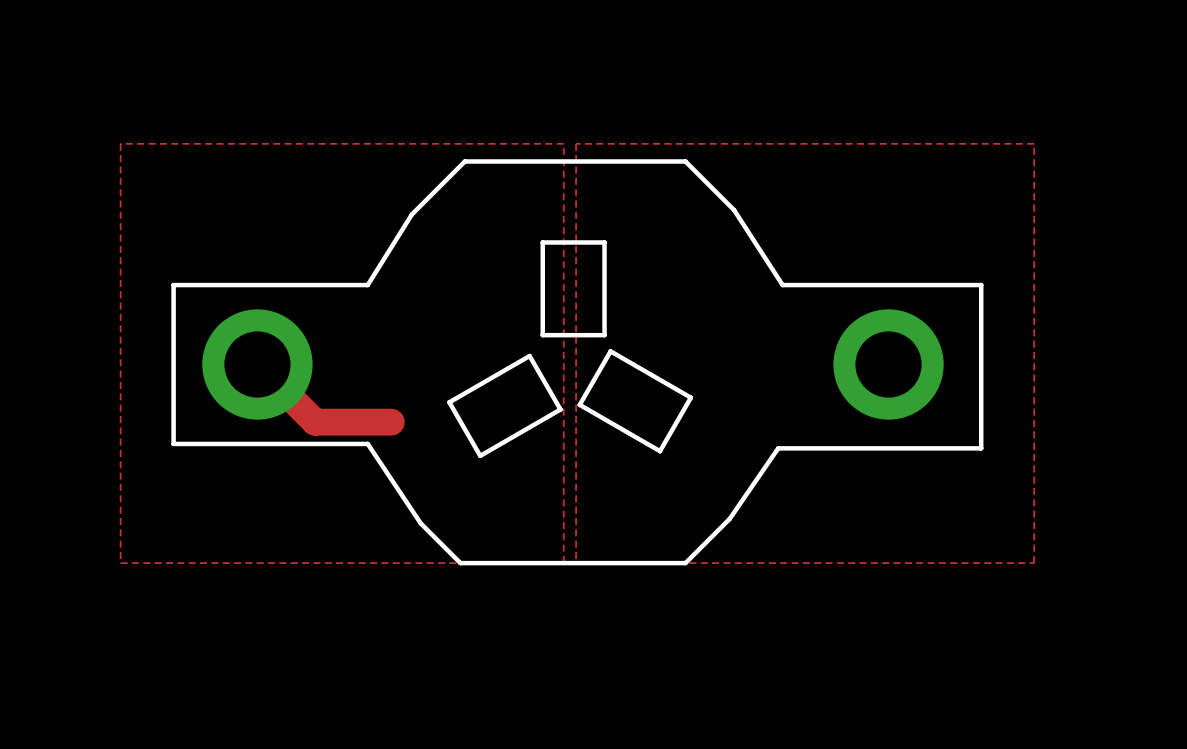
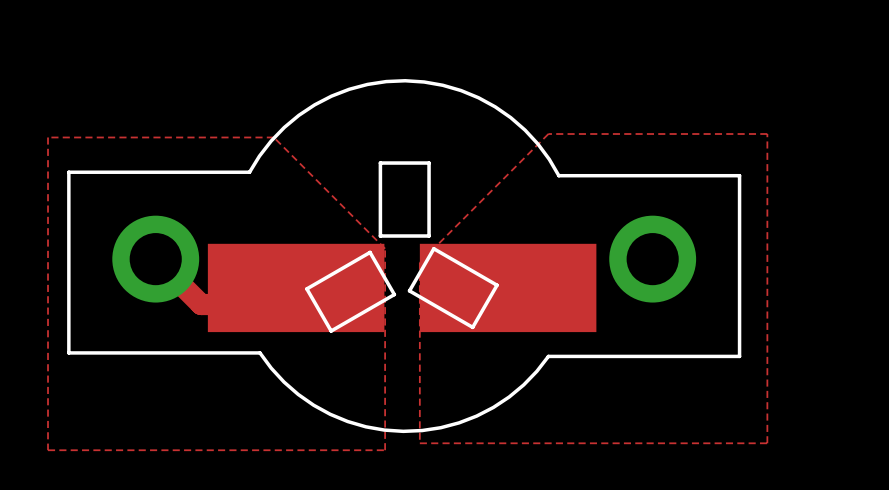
board edge: (685, 161) (464, 161) (411, 214) (367, 285) (173, 285) (173, 443) (367, 443) (420, 523) (460, 563) (685, 563) (729, 518) (778, 448) (981, 448) (981, 285) (782, 285) (734, 210) (685, 161) -> (249, 172) (271, 141) (298, 115) (314, 104) (349, 89) (367, 84) (405, 80) (424, 81) (461, 90) (495, 106) (510, 117) (538, 144) (558, 175) (739, 175) (739, 356) (548, 356) (523, 384) (493, 407) (459, 422) (440, 427) (403, 431) (365, 426) (330, 414) (298, 394) (283, 382) (259, 352) (68, 352) (68, 172) (249, 172)
top zone outline: (1034, 205) (1034, 143) (576, 143) (576, 563) (1034, 563) -> (767, 134) (548, 134) (419, 262) (419, 443) (767, 443) (767, 415)
top zone outline: (120, 210) (120, 143) (563, 143) (563, 563) (120, 563) -> (48, 137) (273, 137) (385, 248) (385, 450) (48, 450) (48, 415)
part: none -> (296, 287)
part: none -> (508, 287)

